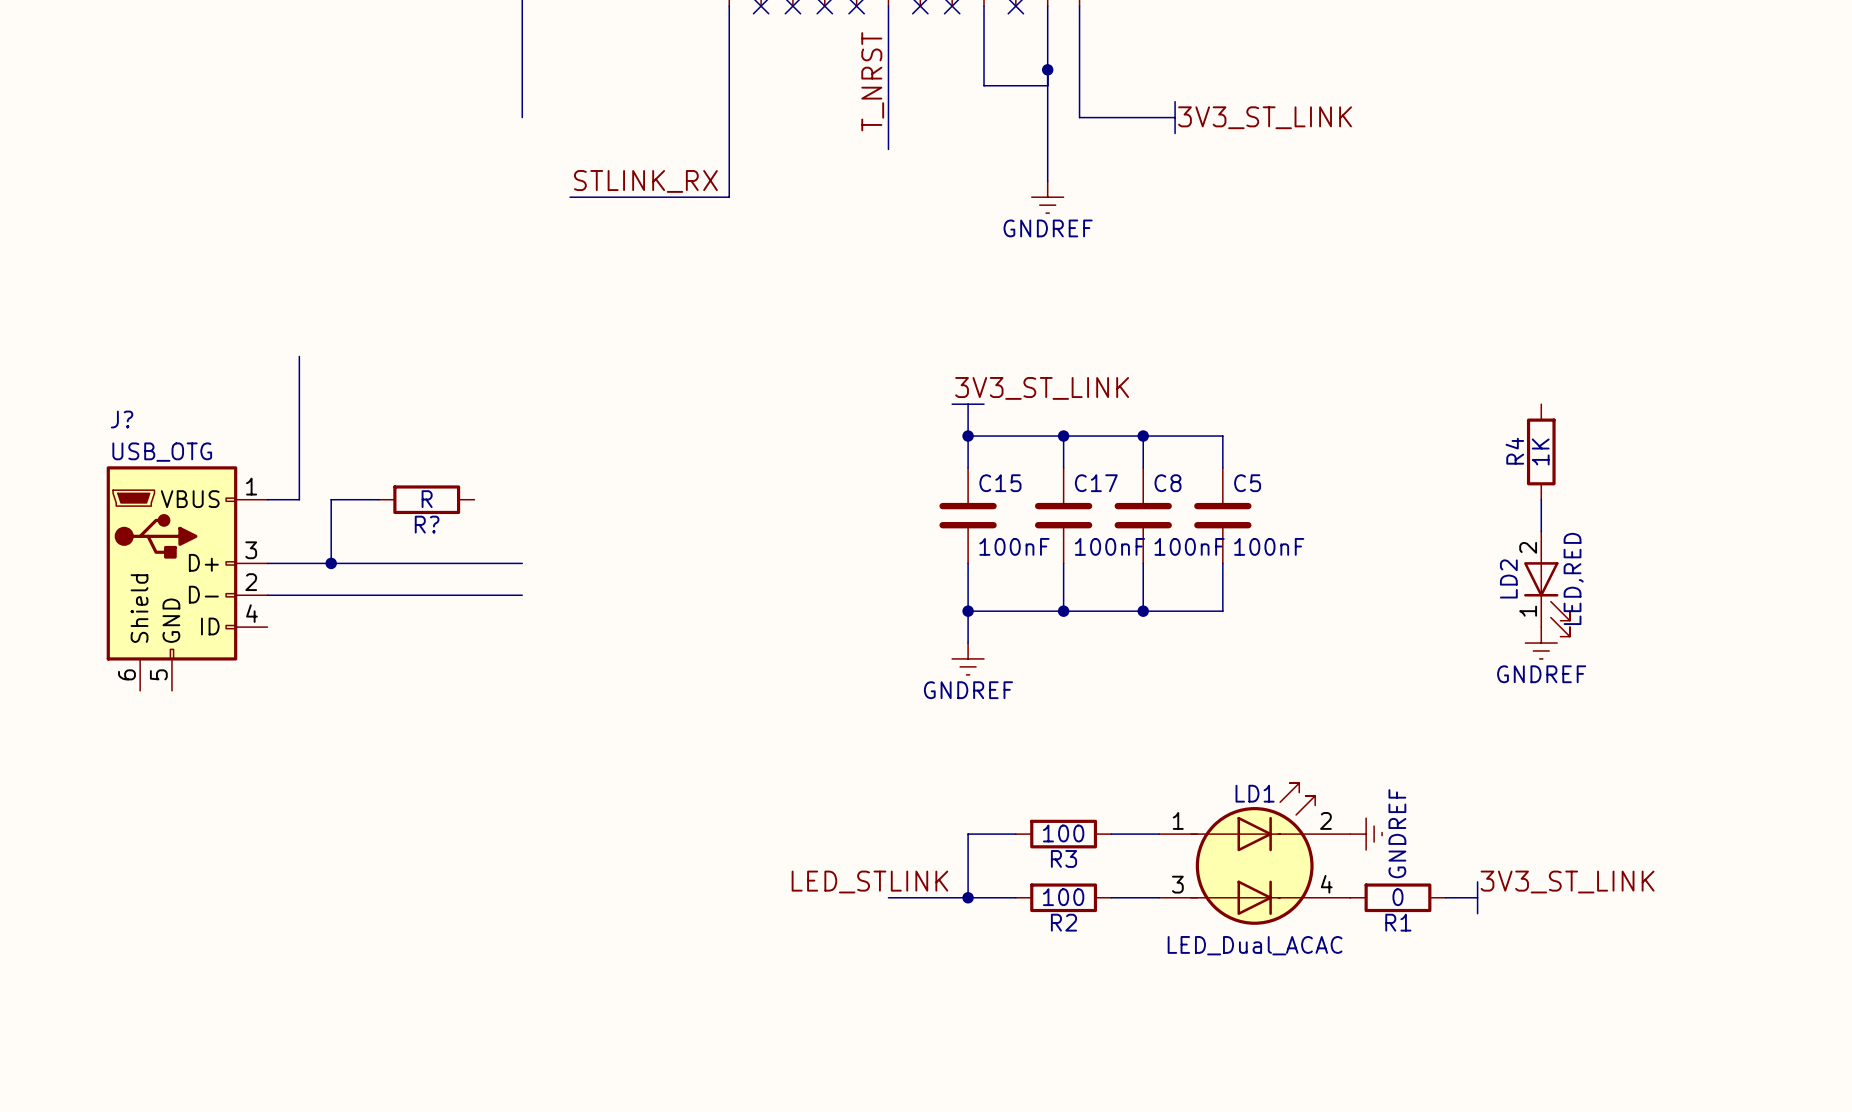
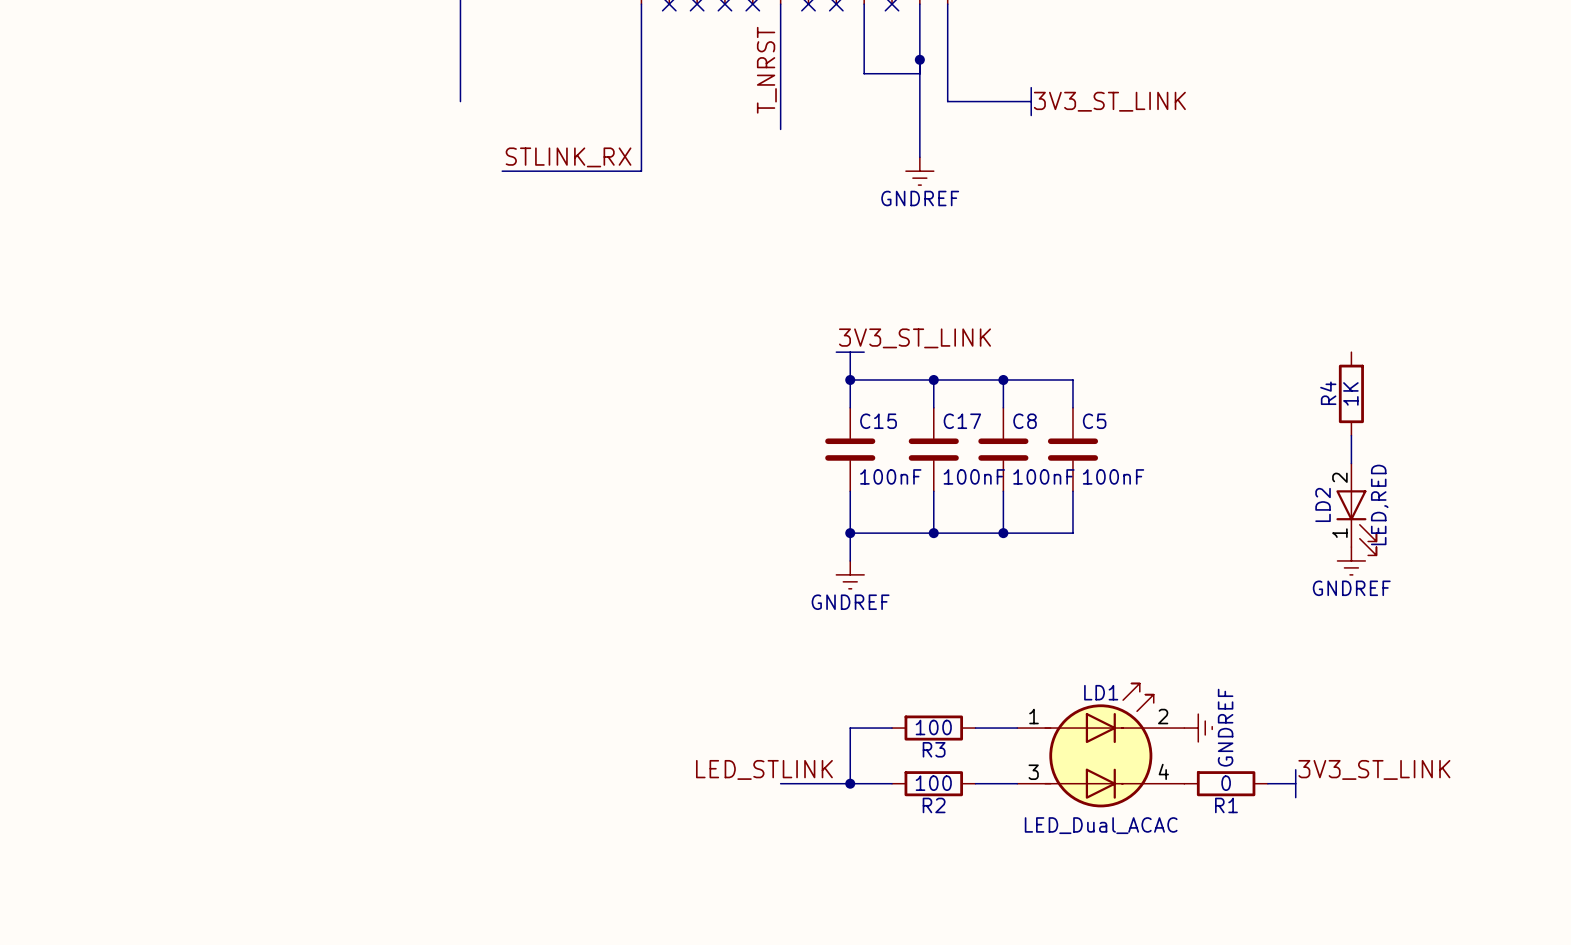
wire: (299, 356) (299, 499) (267, 499) -> none
wire: (378, 499) (331, 499) (331, 563) -> none
R?: R (426, 499) -> none
wire: (267, 563) (522, 563) -> none
junction: (331, 563) -> none
J?: USB_OTG (187, 578) -> none
wire: (267, 595) (522, 595) -> none

